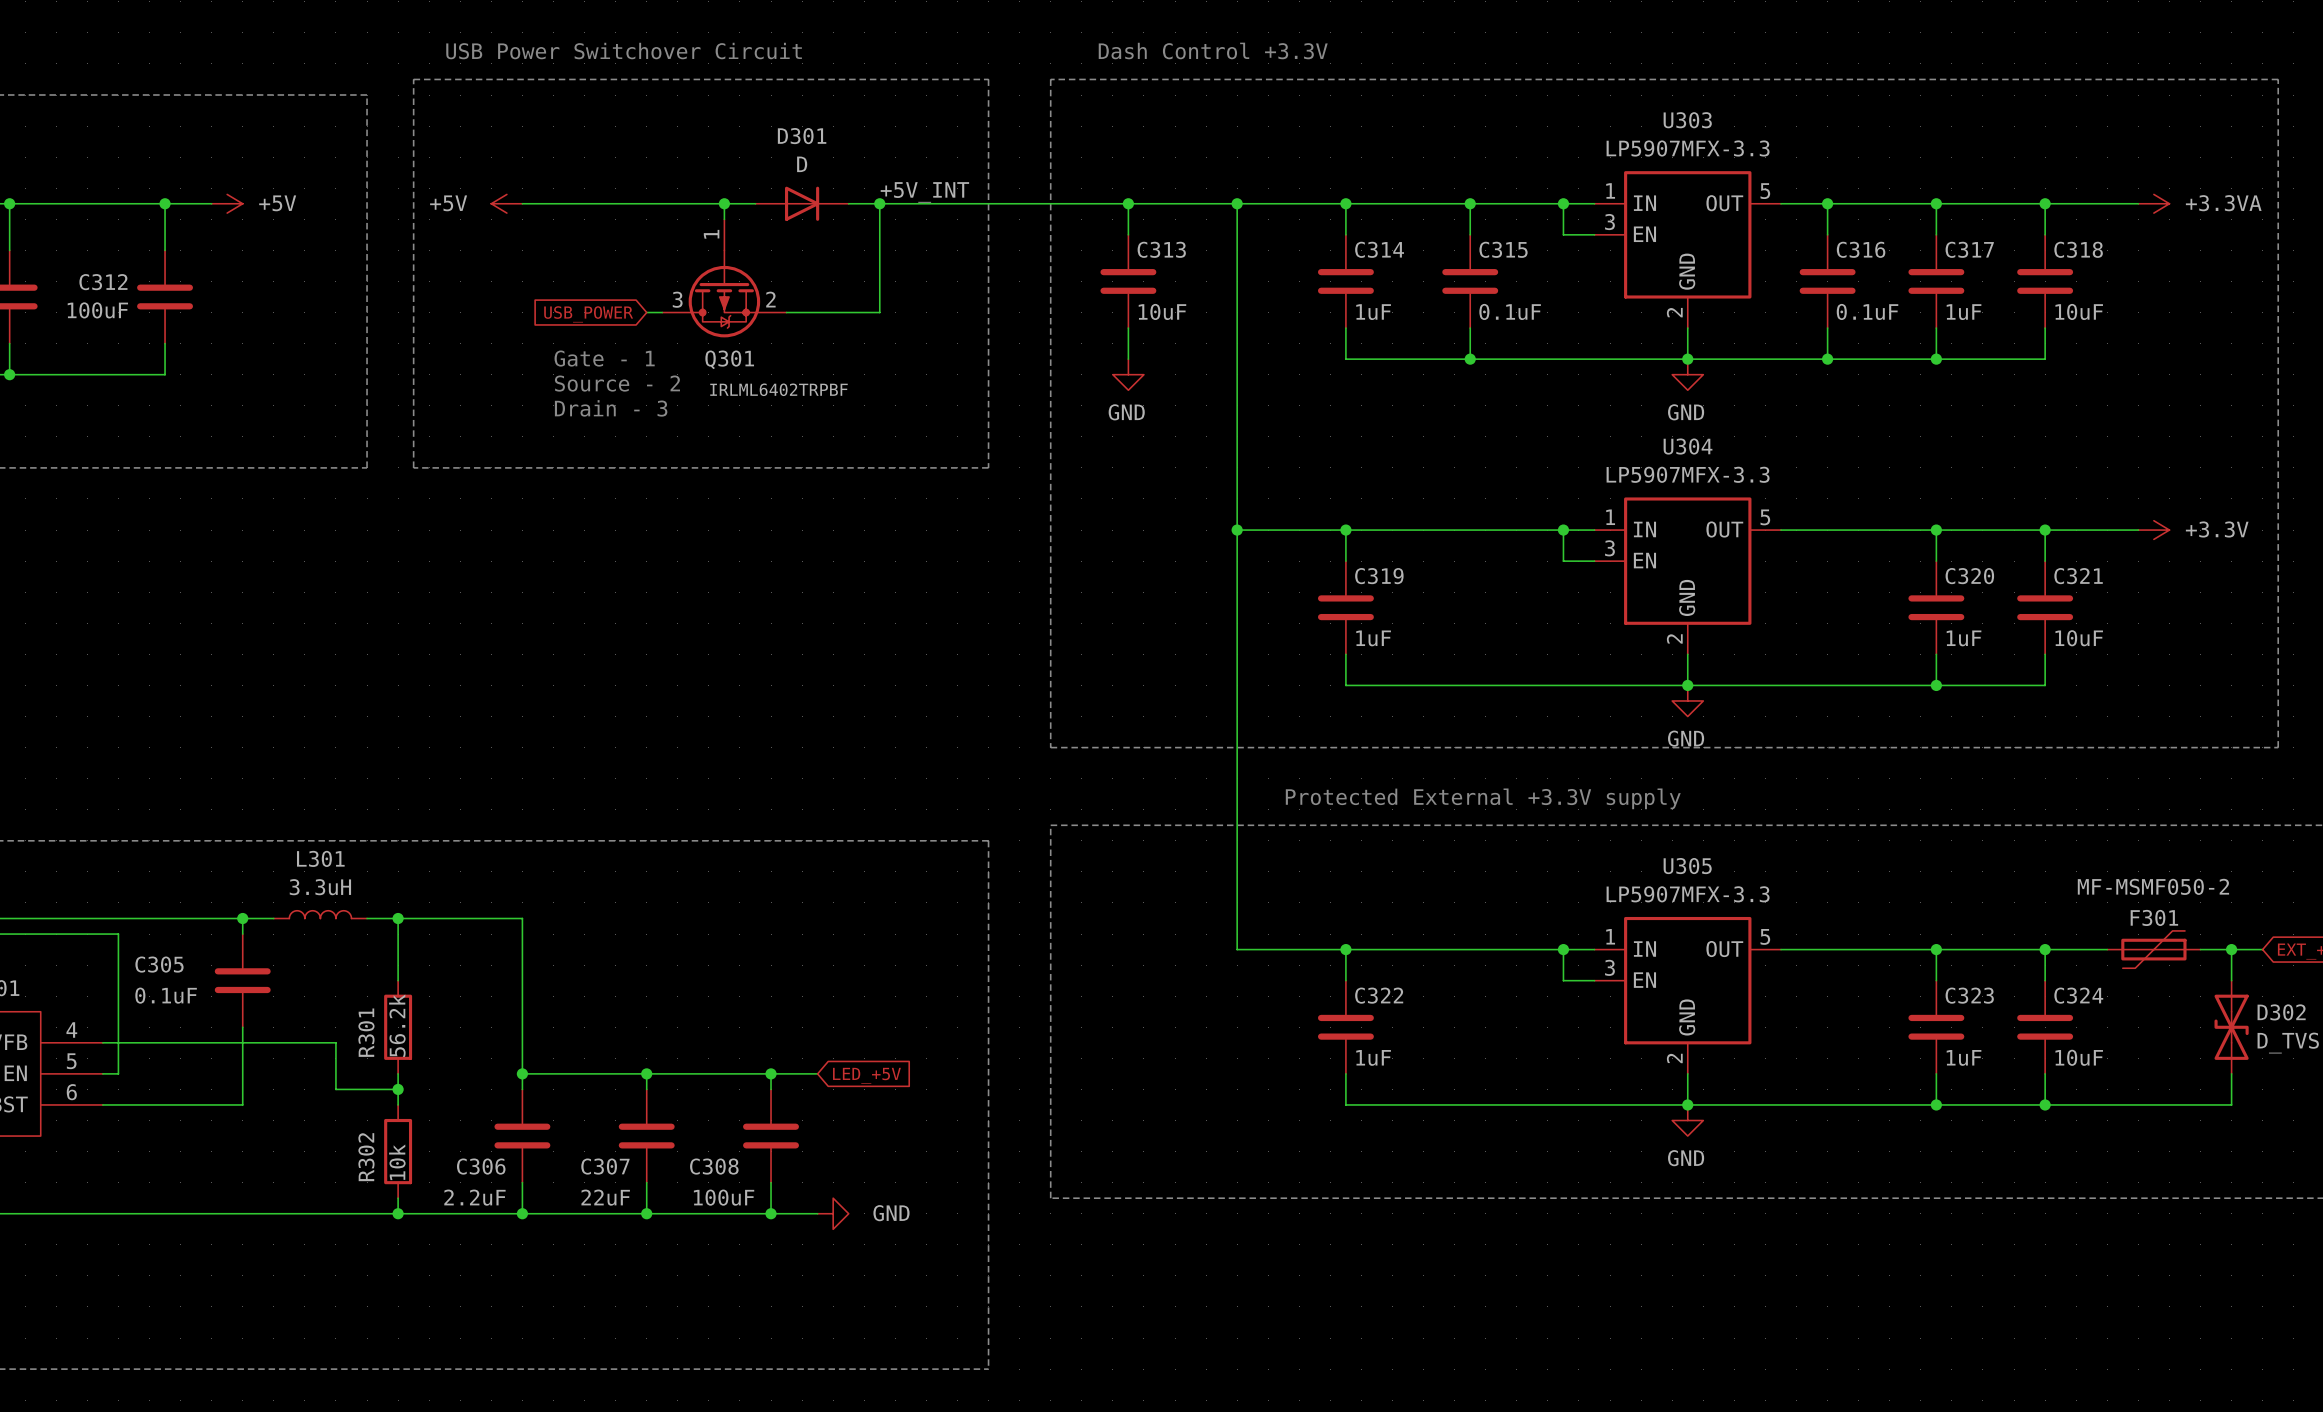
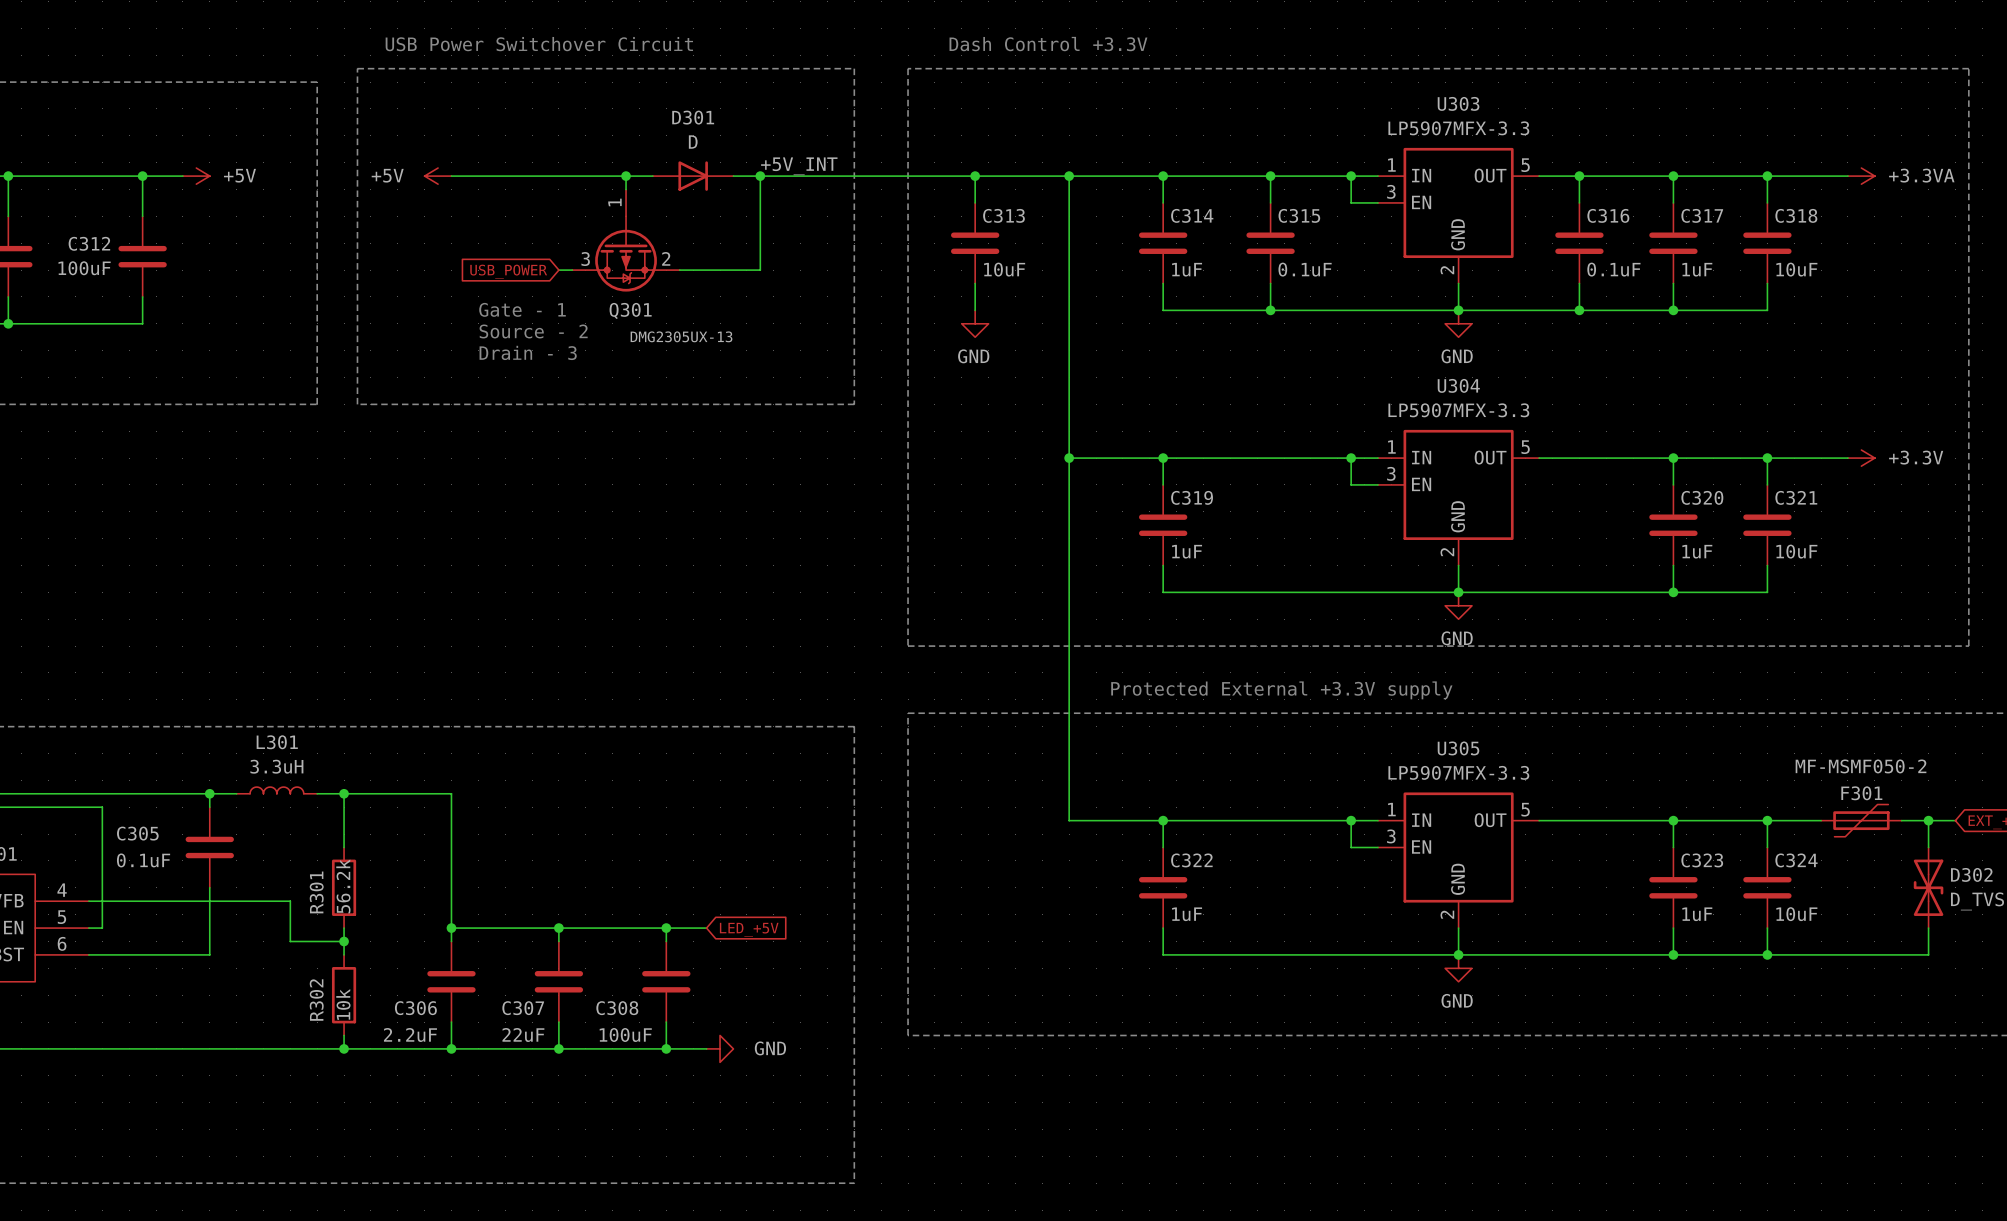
Q301 value: IRLML6402TRPBF (778, 389) -> DMG2305UX-13 (681, 336)

